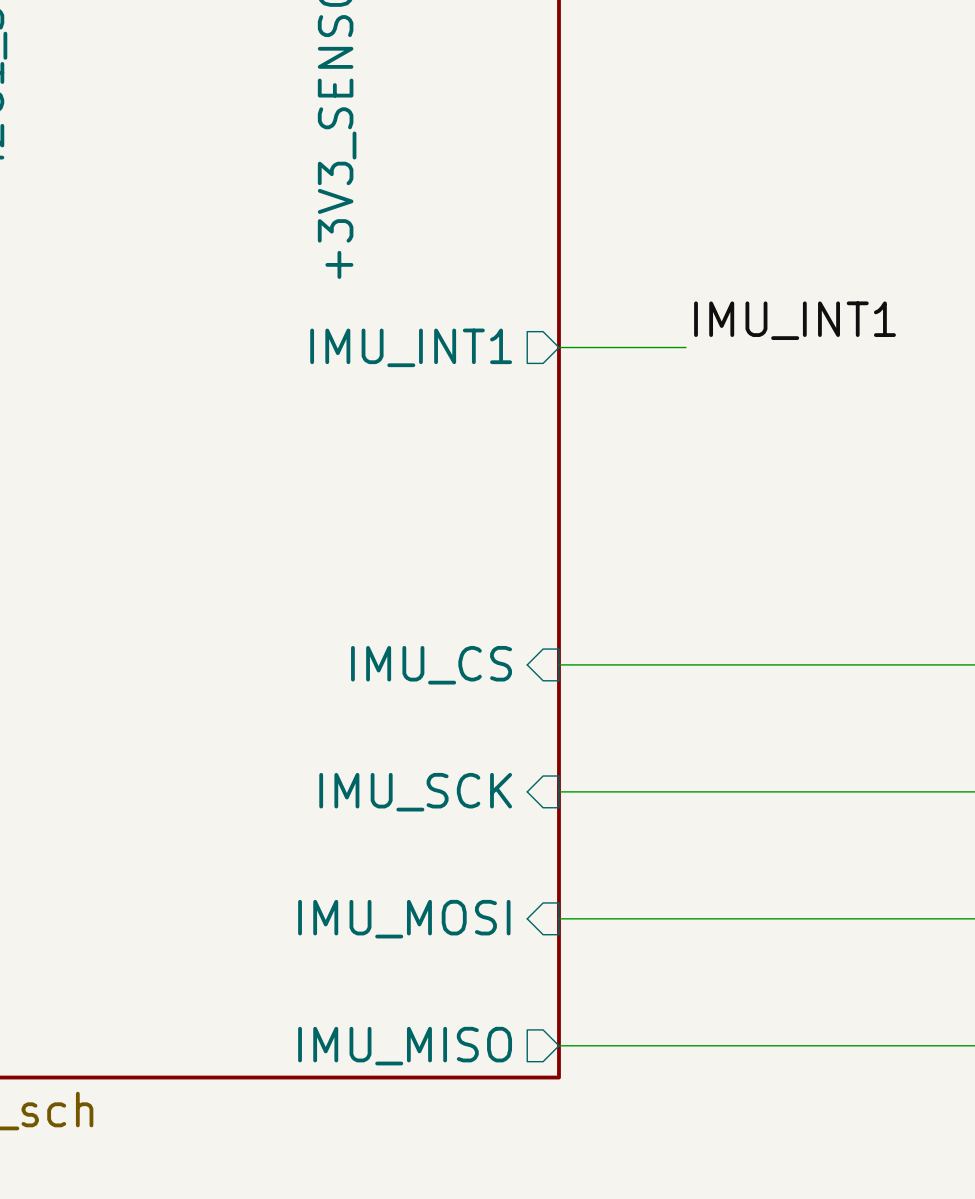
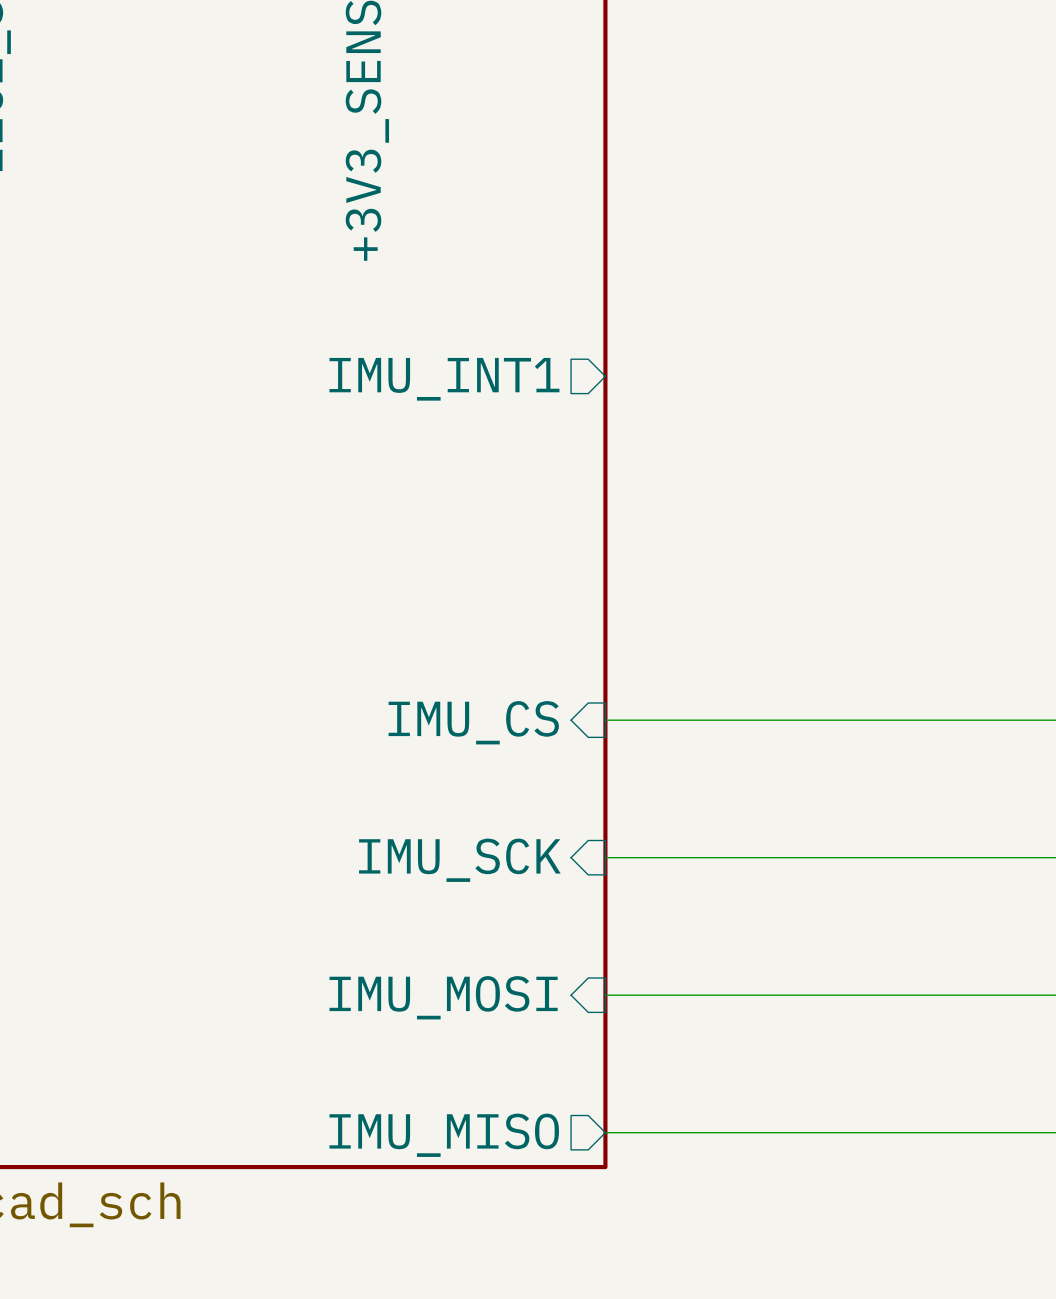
label: IMU_INT1 (795, 320) -> none
wire: (558, 347) (685, 347) -> none

